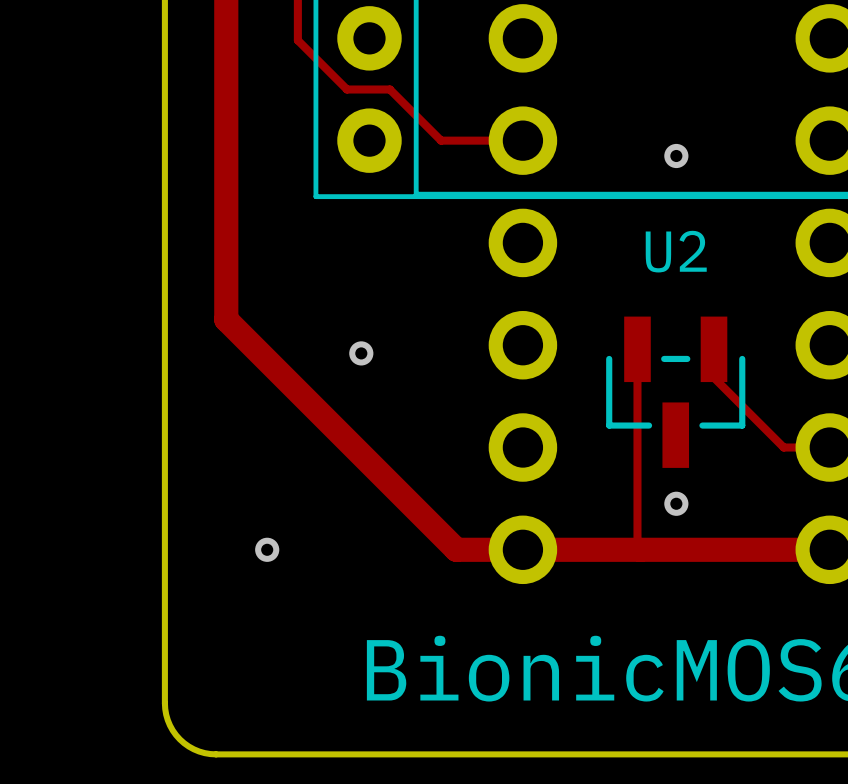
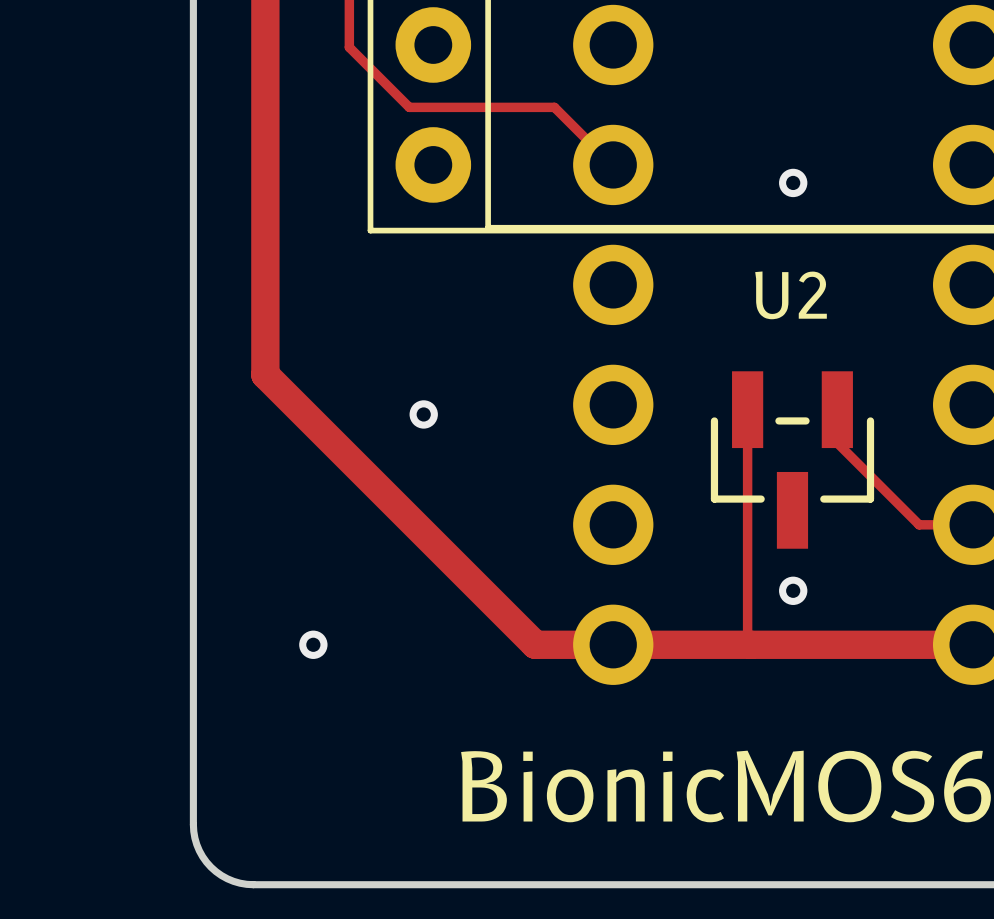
track: (346, 89) (389, 89) (441, 140) (521, 140) -> (406, 104) (409, 107) (554, 107) (612, 164)

